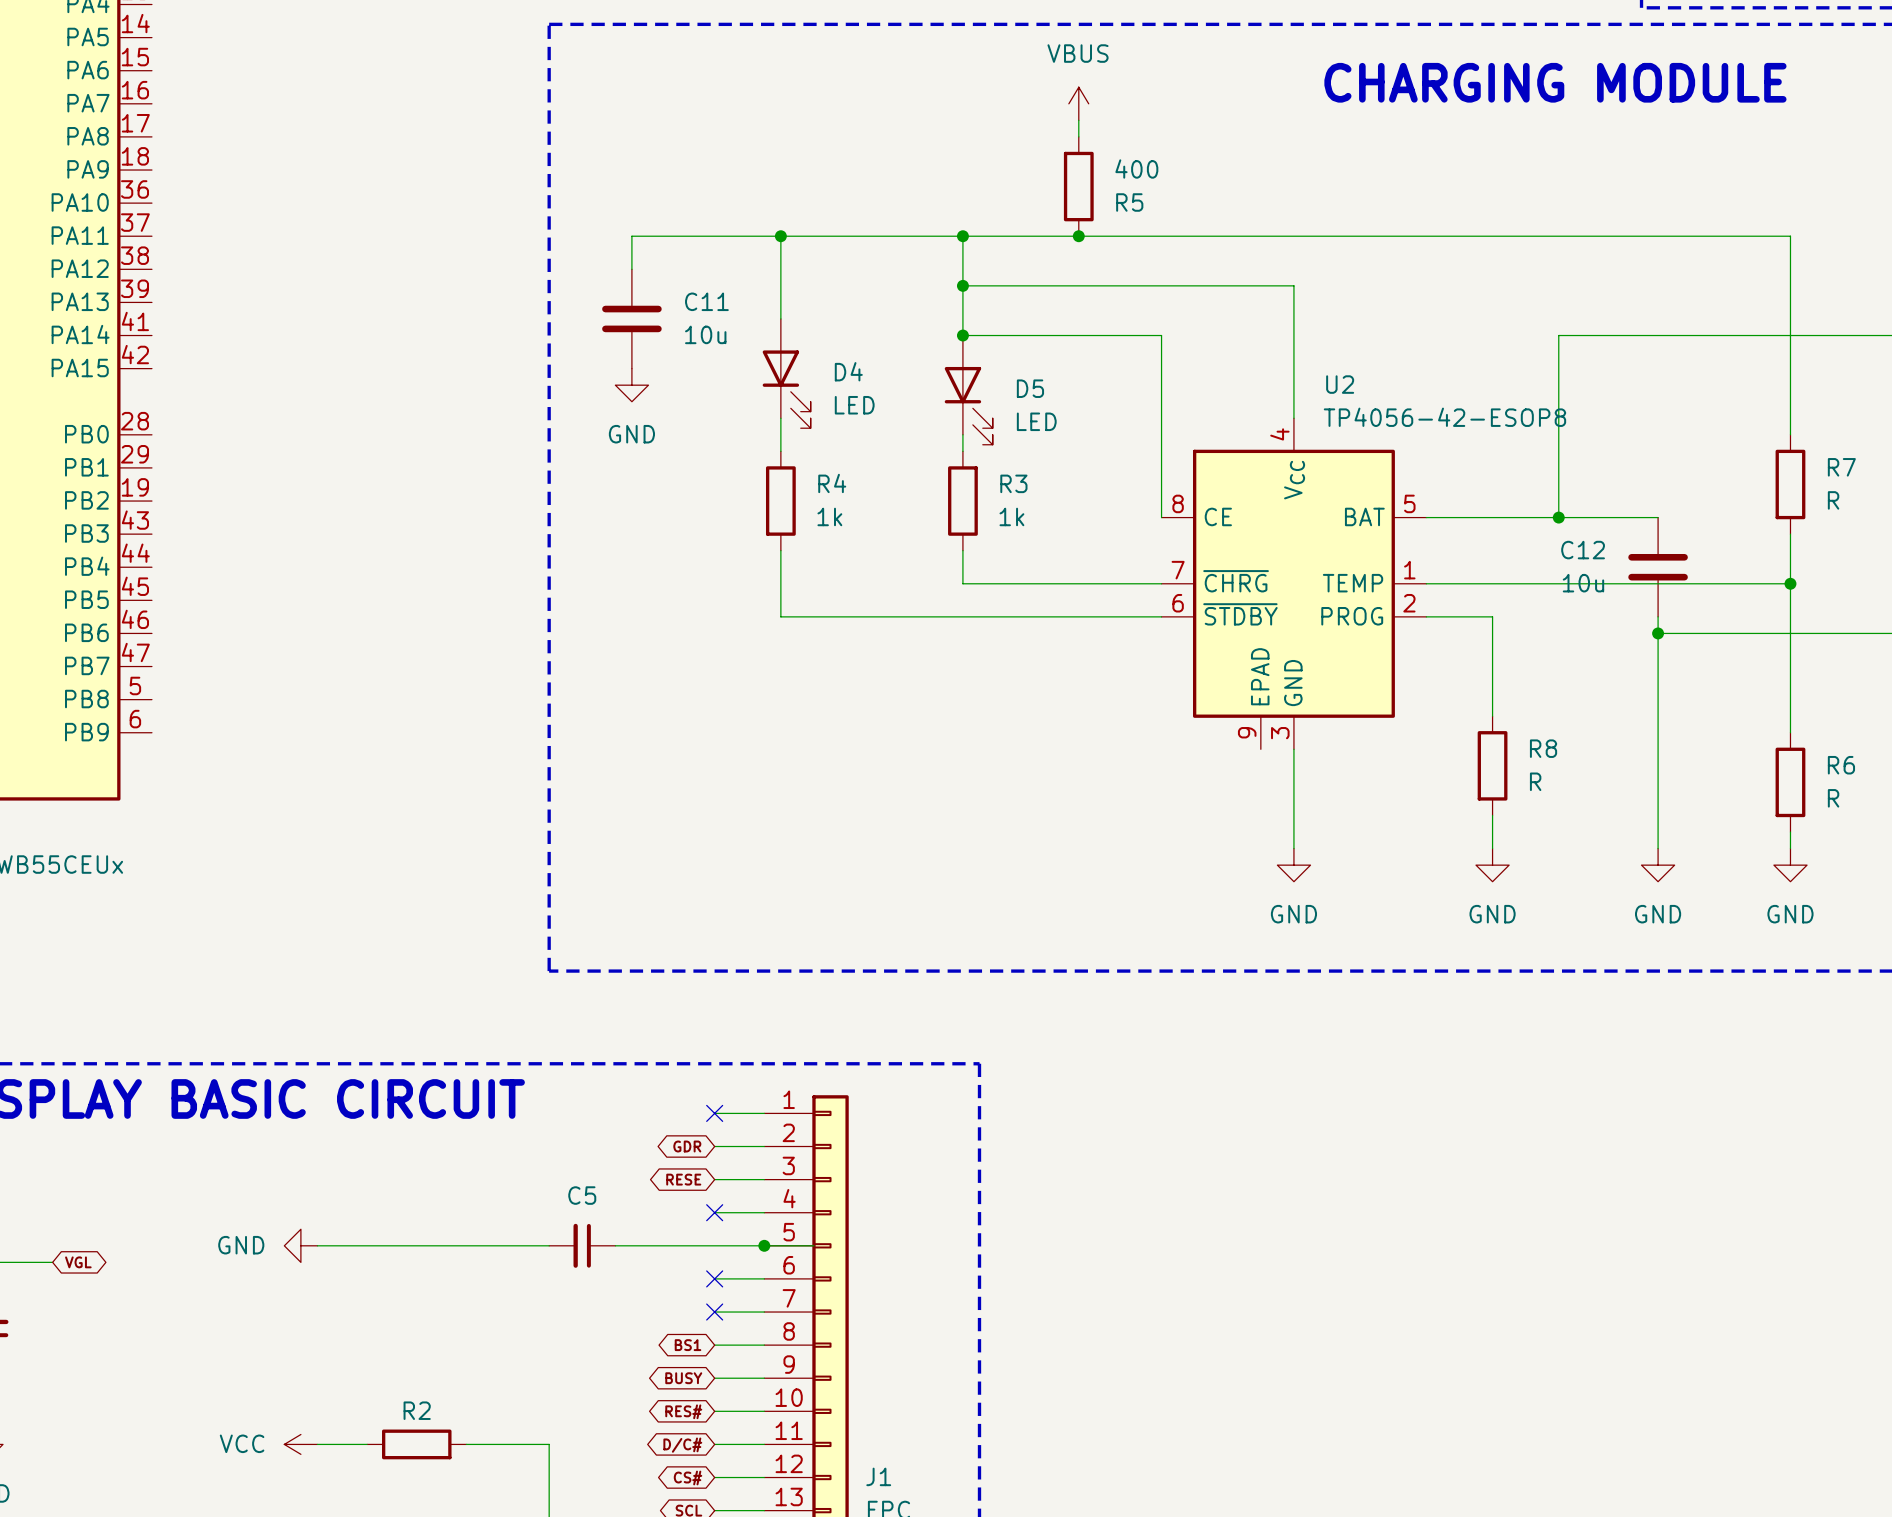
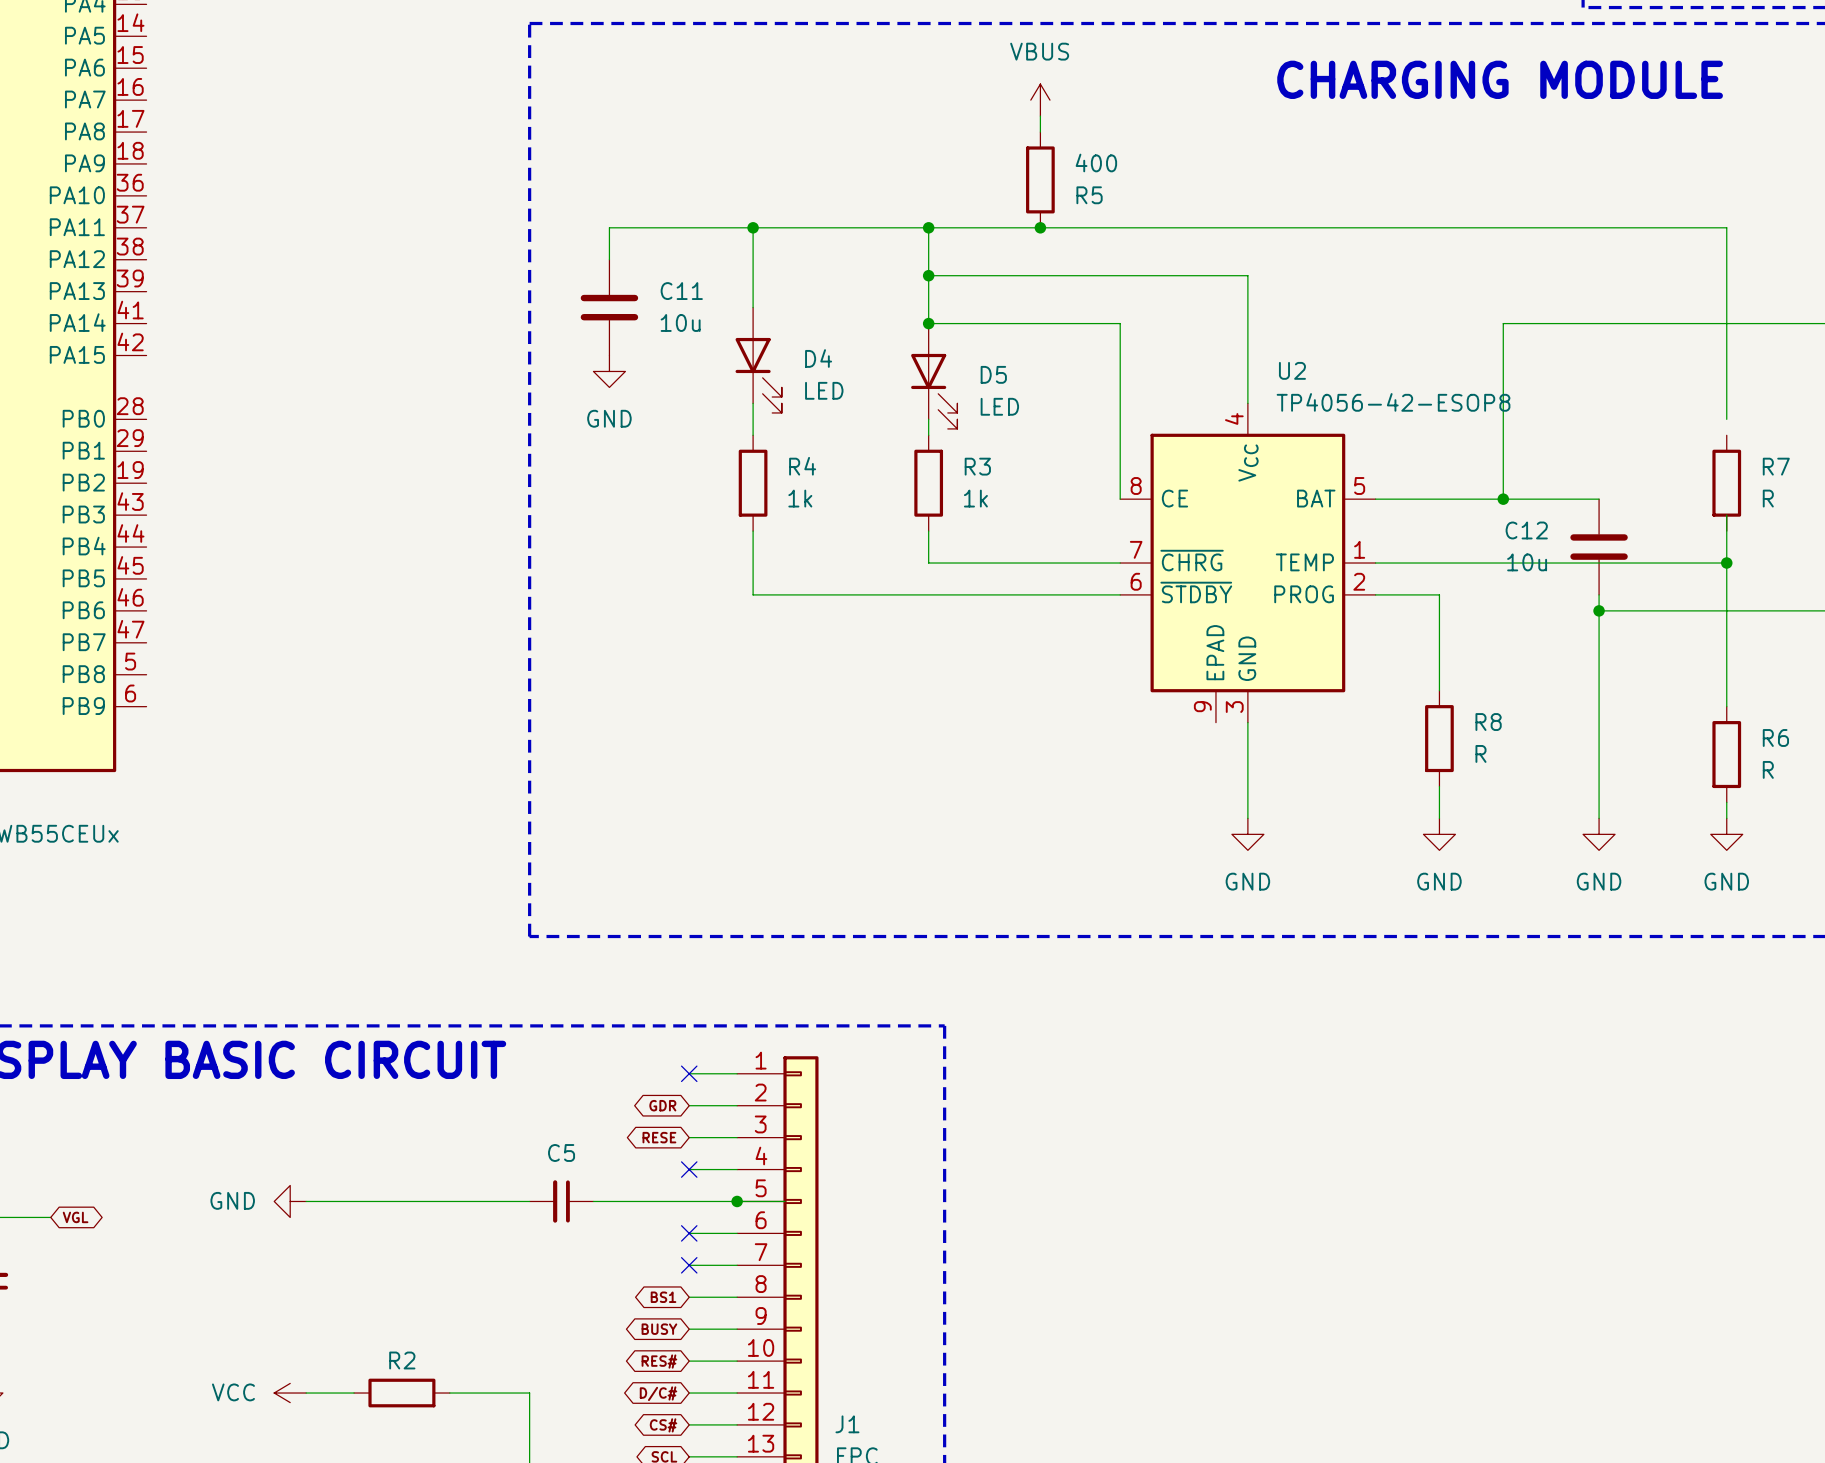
R7 position: (1790, 484) -> (1726, 483)

